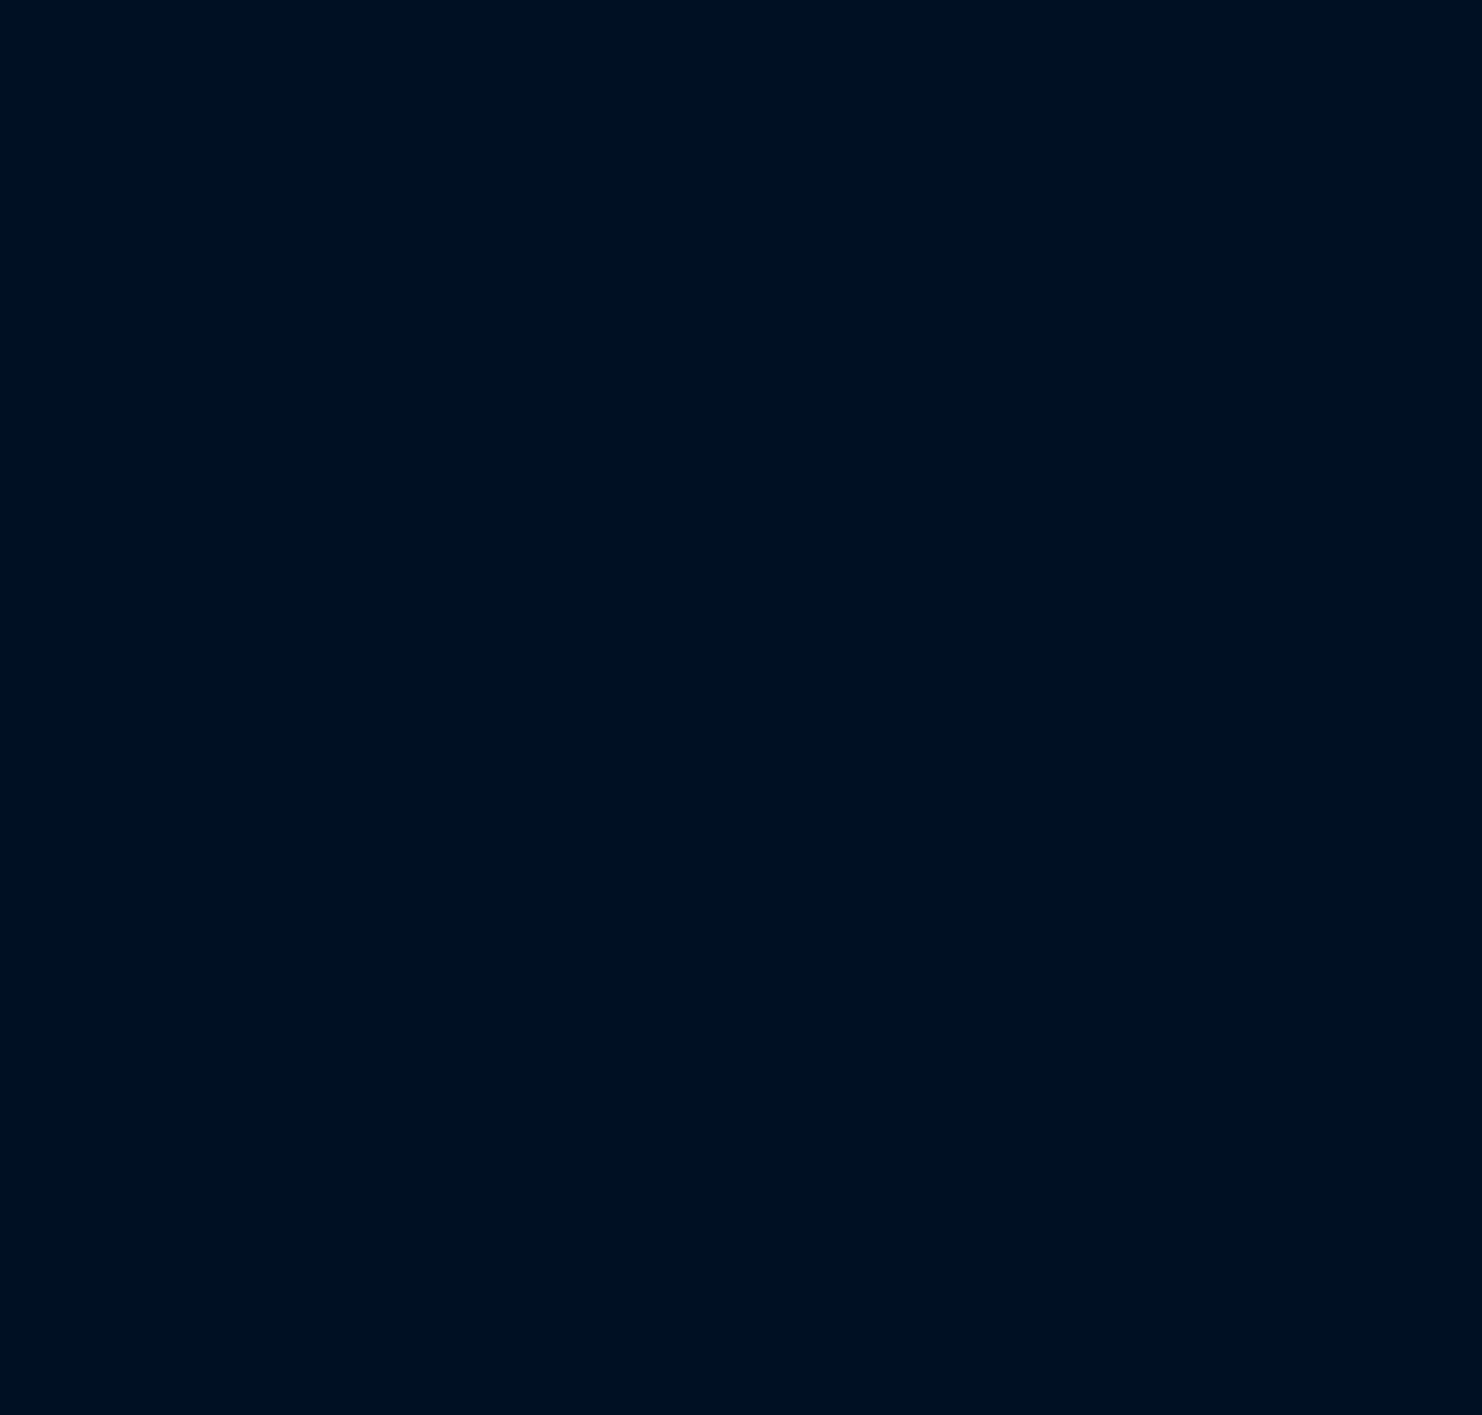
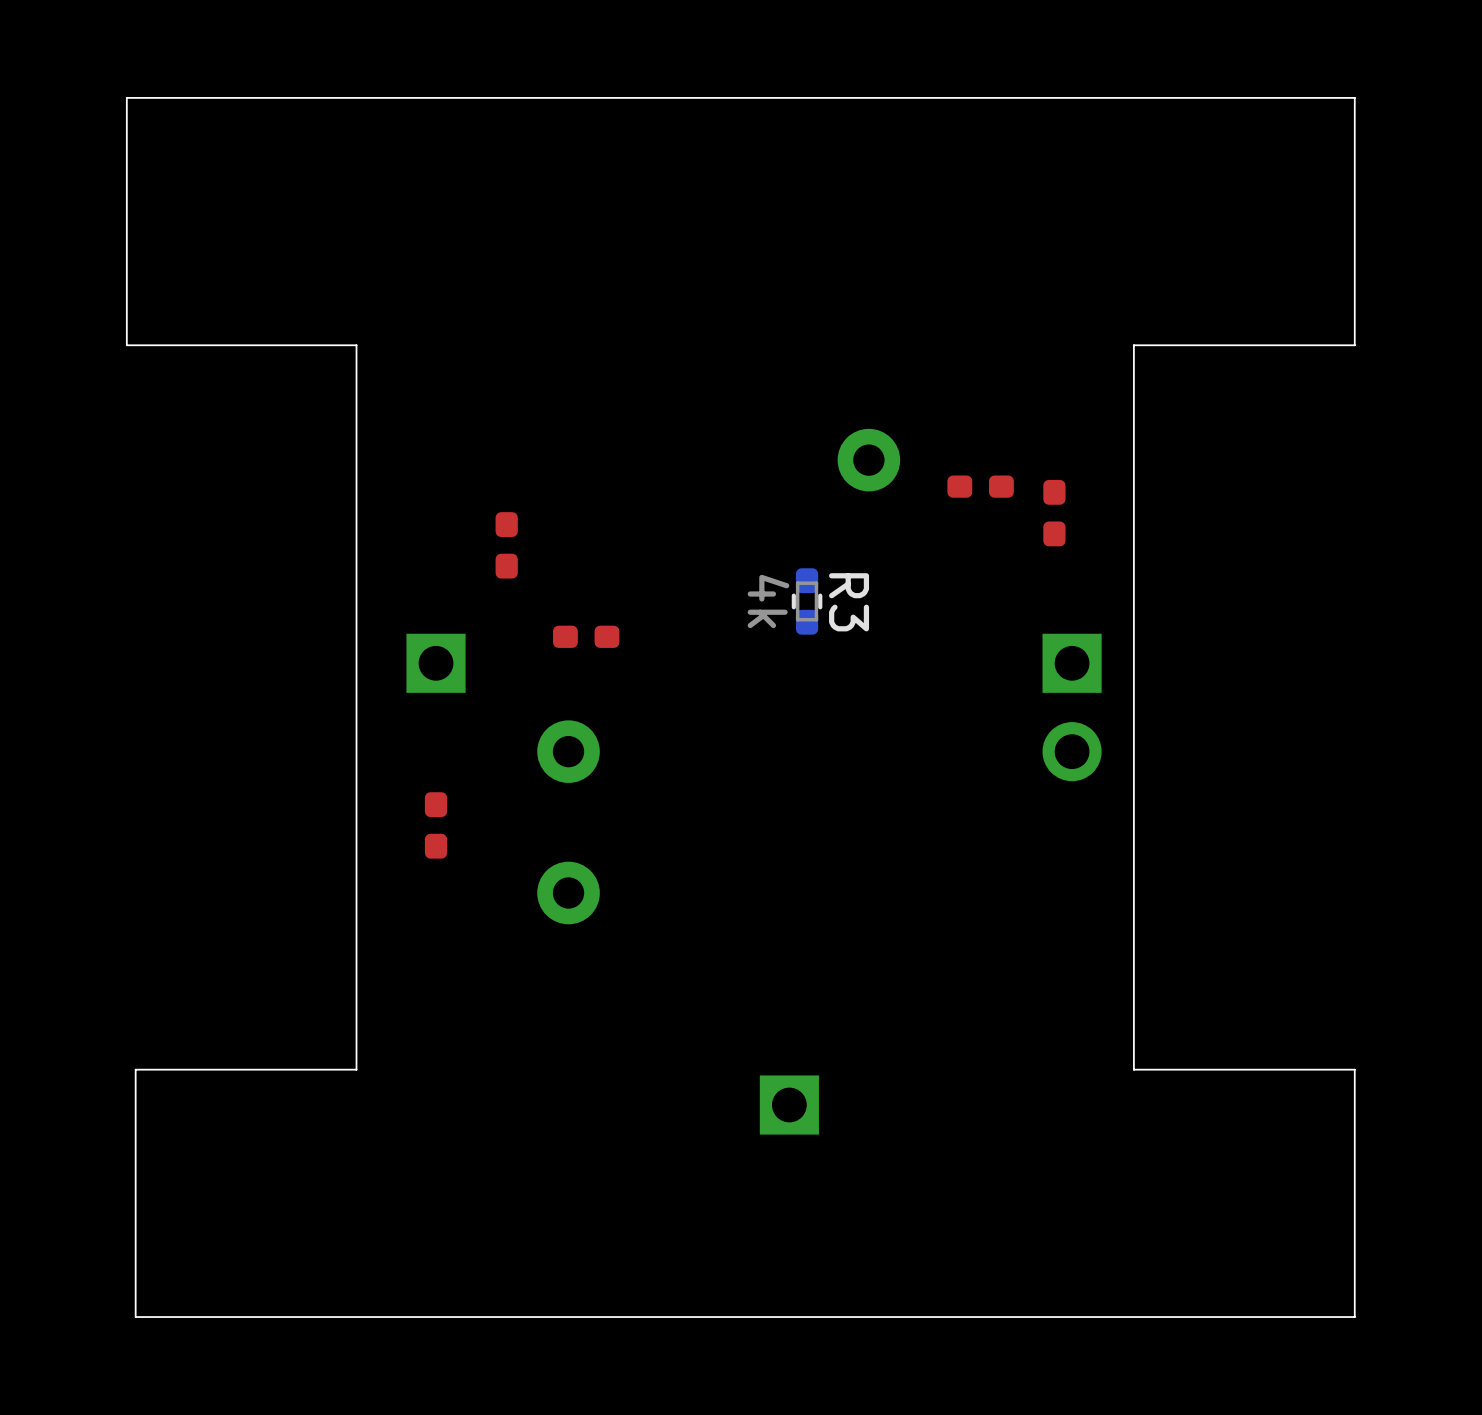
board edge: none -> (1354, 97) (126, 97) (126, 345) (356, 345) (356, 1069) (135, 1069) (135, 1317) (1354, 1317) (1354, 1069) (1133, 1069) (1133, 345) (1354, 345) (1354, 97)
part: none -> (868, 460)
part: none -> (980, 486)
part: none -> (1054, 513)
part: none -> (506, 545)
R3: none -> 4k (807, 601)
part: none -> (586, 636)
part: none -> (436, 663)
part: none -> (1072, 707)
part: none -> (568, 751)
part: none -> (436, 825)
part: none -> (568, 892)
part: none -> (789, 1105)

